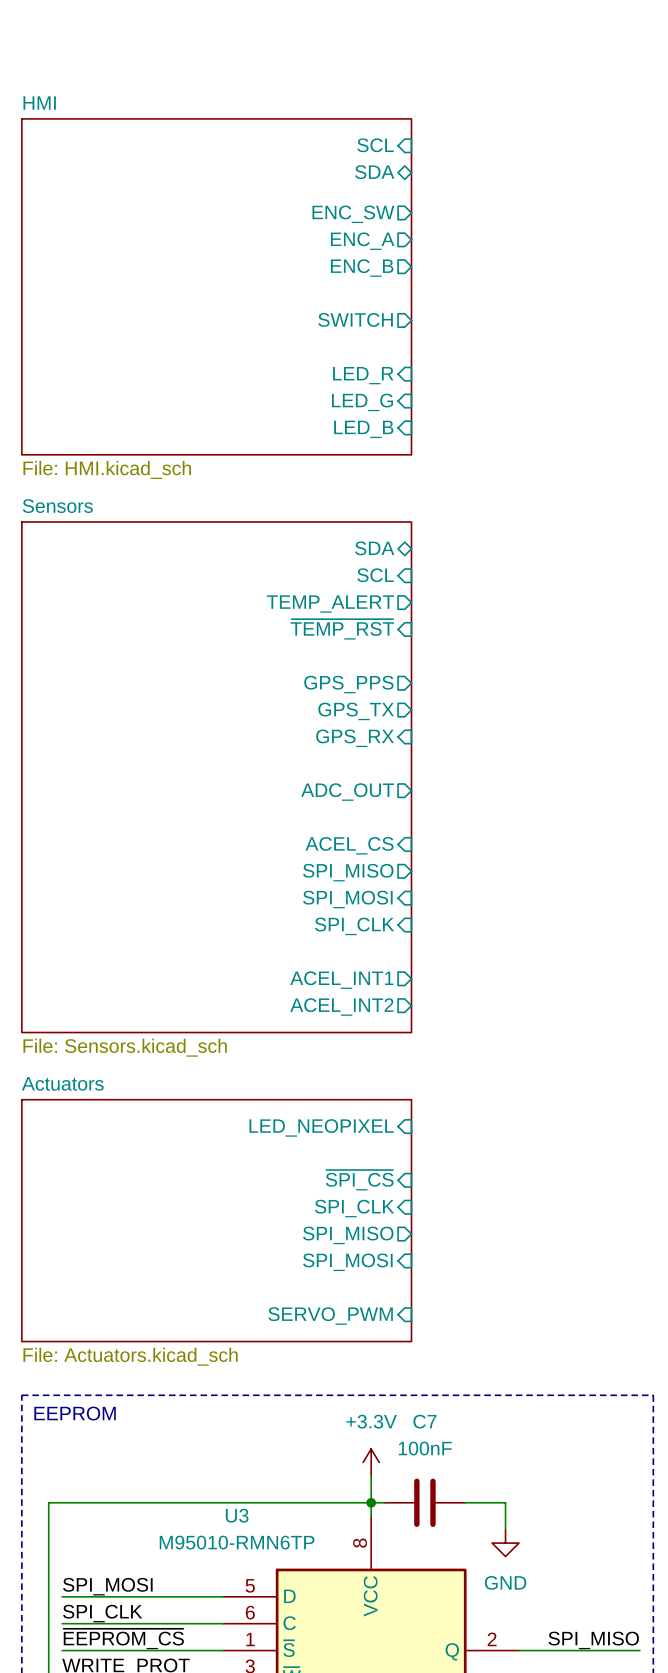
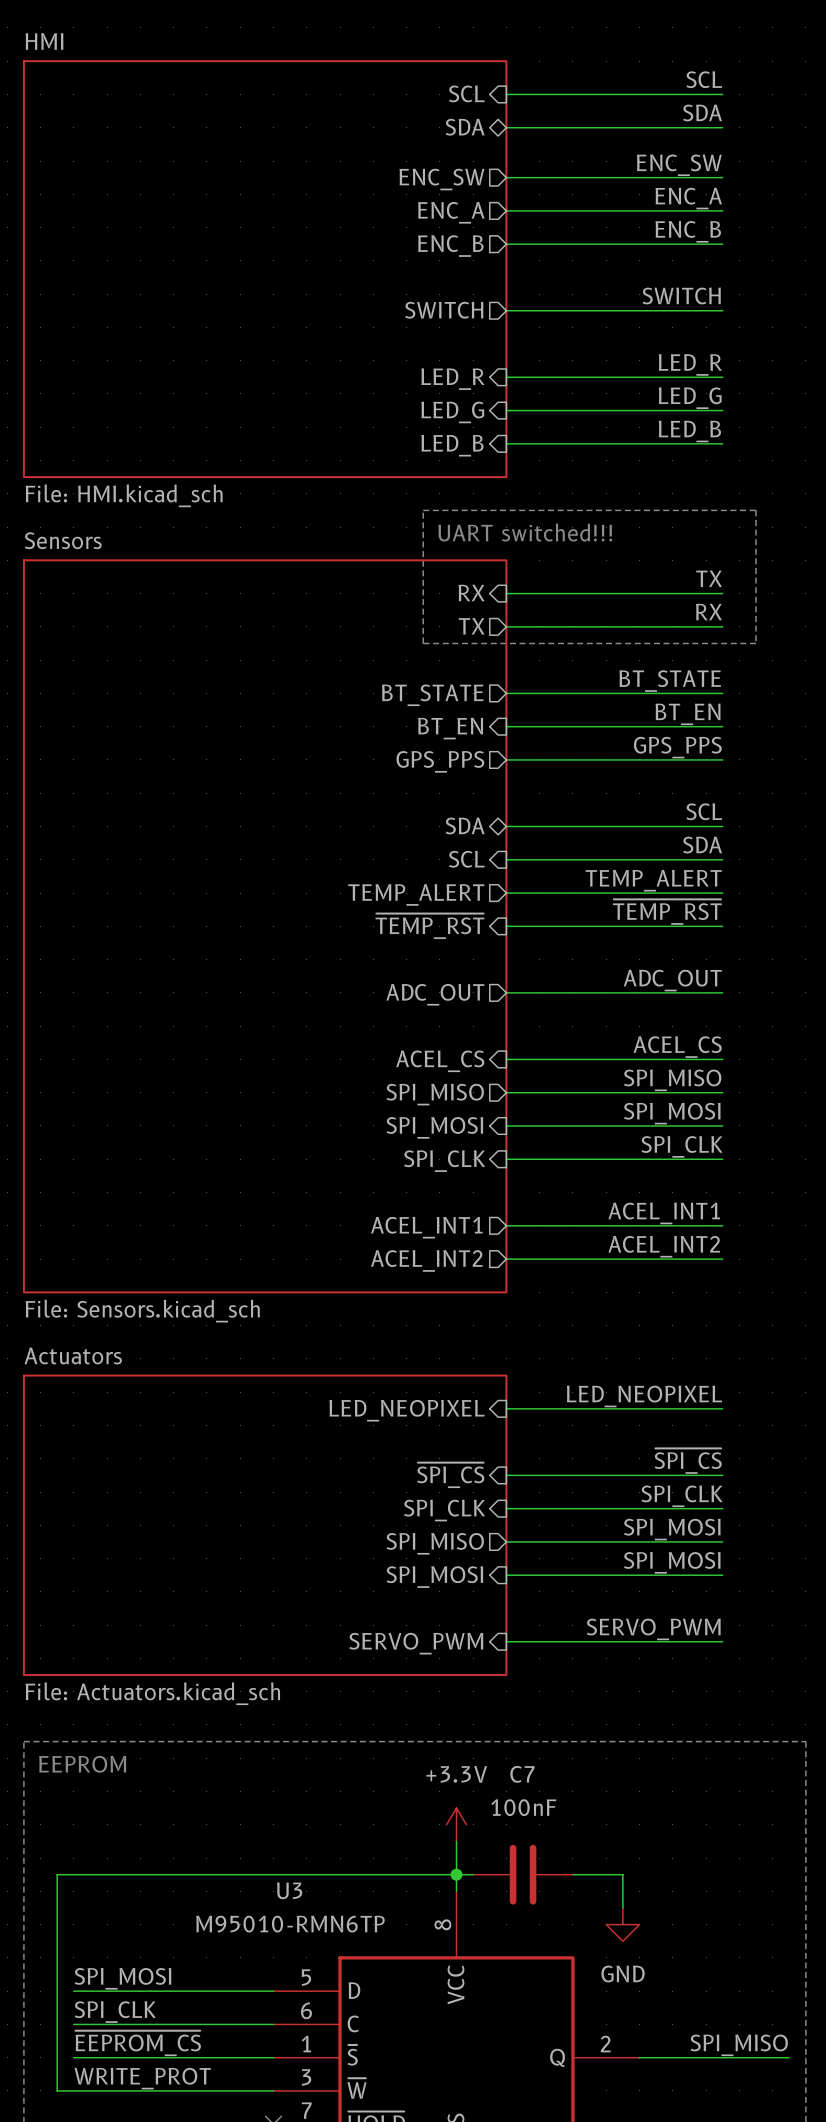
label: none -> SCL (704, 79)
wire: none -> (506, 94) (722, 94)
label: none -> SDA (702, 112)
wire: none -> (506, 127) (722, 127)
label: none -> ENC_SW (679, 165)
wire: none -> (506, 177) (722, 177)
sheet pin position: SCL (375, 145) -> SCL (466, 93)
label: none -> ENC_A (688, 198)
wire: none -> (506, 210) (722, 210)
sheet pin: none -> ENC_A (451, 212)
sheet pin position: SDA (374, 172) -> SDA (465, 127)
label: none -> ENC_B (688, 231)
wire: none -> (506, 244) (722, 244)
sheet pin position: ENC_SW (353, 214) -> ENC_SW (441, 179)
label: none -> SWITCH (681, 295)
wire: none -> (506, 310) (722, 310)
sheet pin: ENC_A (362, 241) -> SWITCH (444, 310)
sheet pin position: ENC_B (362, 268) -> ENC_B (450, 246)
label: none -> LED_R (690, 364)
sheet HMI position: (216, 286) -> (265, 269)
wire: none -> (506, 377) (722, 377)
label: none -> LED_G (690, 398)
sheet pin shape: output (355, 319) -> input (452, 412)
sheet pin: SWITCH (355, 319) -> LED_G (452, 412)
wire: none -> (506, 410) (722, 410)
label: none -> LED_B (689, 431)
wire: none -> (506, 443) (722, 443)
sheet pin position: LED_R (363, 375) -> LED_R (452, 379)
line: none -> (423, 510) (755, 510) (755, 643) (423, 643) (423, 510)
sheet pin: LED_G (362, 402) -> none
text: none -> UART switched!!! (525, 532)
sheet pin position: LED_B (363, 429) -> LED_B (452, 445)
label: none -> TX (709, 578)
sheet pin: none -> RX (471, 592)
wire: none -> (506, 593) (722, 593)
label: none -> RX (708, 612)
sheet pin: none -> TX (471, 626)
wire: none -> (506, 626) (722, 626)
label: none -> BT_STATE (670, 681)
sheet pin shape: bidirectional (374, 548) -> output (432, 695)
sheet pin: SDA (374, 548) -> BT_STATE (432, 695)
wire: none -> (506, 693) (722, 693)
label: none -> BT_EN (687, 714)
sheet pin: SCL (375, 575) -> BT_EN (450, 728)
wire: none -> (506, 726) (722, 726)
label: none -> GPS_PPS (677, 747)
wire: none -> (506, 759) (722, 759)
sheet pin: TEMP_ALERT (330, 604) -> GPS_PPS (440, 761)
sheet pin: ~{TEMP_RST} (342, 629) -> none
label: none -> SCL (704, 811)
sheet pin: none -> SDA (465, 825)
wire: none -> (506, 826) (722, 826)
label: none -> SDA (702, 845)
wire: none -> (506, 859) (722, 859)
sheet pin shape: output (348, 684) -> input (466, 859)
sheet pin: GPS_PPS (348, 684) -> SCL (466, 859)
label: none -> TEMP_ALERT (653, 880)
wire: none -> (506, 893) (722, 893)
sheet pin: GPS_TX (356, 711) -> TEMP_ALERT (416, 894)
label: none -> ~{TEMP_RST} (667, 912)
sheet Sensors: none -> File: Sensors.kicad_sch (265, 926)
wire: none -> (506, 926) (722, 926)
sheet pin: GPS_RX (355, 738) -> ~{TEMP_RST} (429, 926)
sheet Sensors: File: Sensors.kicad_sch (216, 777) -> none
label: none -> ADC_OUT (672, 980)
wire: none -> (506, 992) (722, 992)
label: none -> ACEL_CS (677, 1047)
wire: none -> (506, 1059) (722, 1059)
label: none -> SPI_MISO (672, 1080)
wire: none -> (506, 1092) (722, 1092)
label: none -> SPI_MOSI (672, 1113)
wire: none -> (506, 1125) (722, 1125)
label: none -> SPI_CLK (682, 1146)
wire: none -> (506, 1159) (722, 1159)
label: none -> ACEL_INT1 (664, 1213)
wire: none -> (506, 1225) (722, 1225)
label: none -> ACEL_INT2 (664, 1246)
wire: none -> (506, 1259) (722, 1259)
label: none -> LED_NEOPIXEL (644, 1396)
wire: none -> (506, 1408) (722, 1408)
label: none -> ~{SPI_CS} (688, 1461)
wire: none -> (506, 1475) (722, 1475)
label: none -> SPI_CLK (682, 1496)
wire: none -> (506, 1508) (722, 1508)
label: none -> SPI_MOSI (672, 1529)
wire: none -> (506, 1541) (722, 1541)
label: none -> SPI_MOSI (672, 1562)
wire: none -> (506, 1575) (722, 1575)
label: none -> SERVO_PWM (653, 1629)
wire: none -> (506, 1641) (722, 1641)

